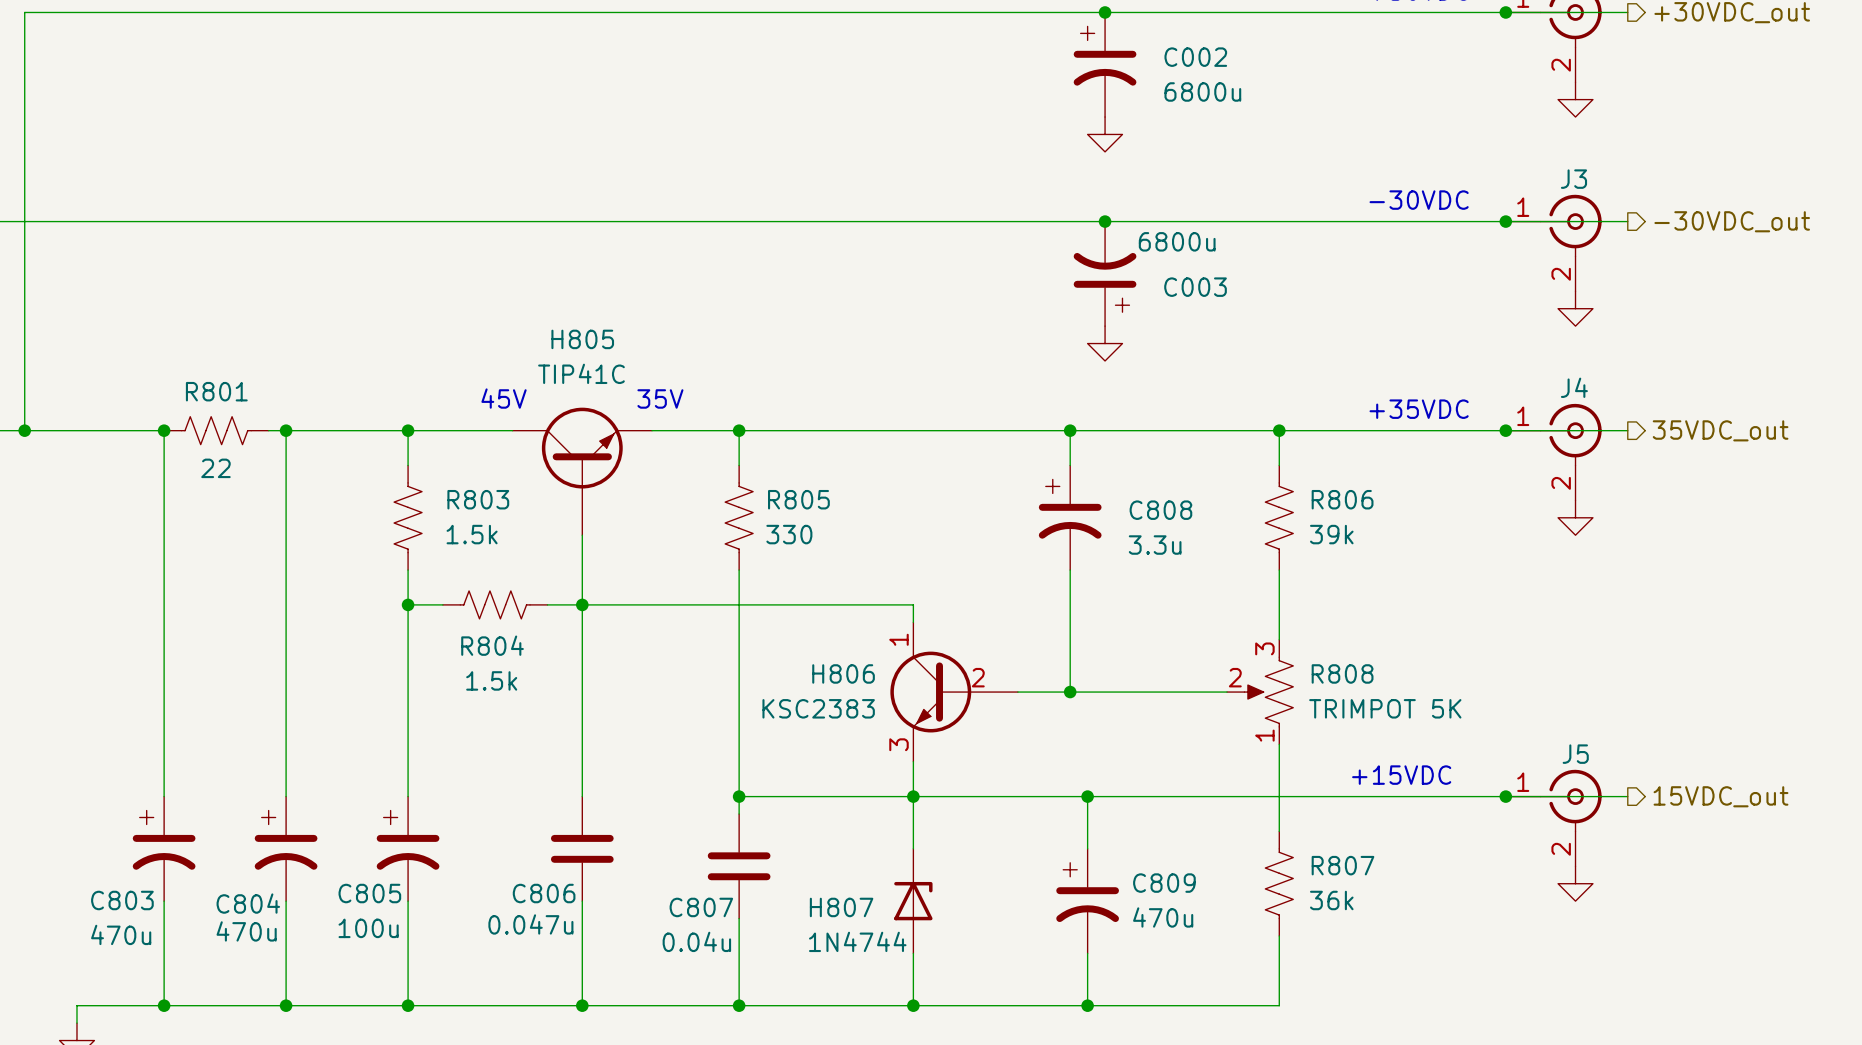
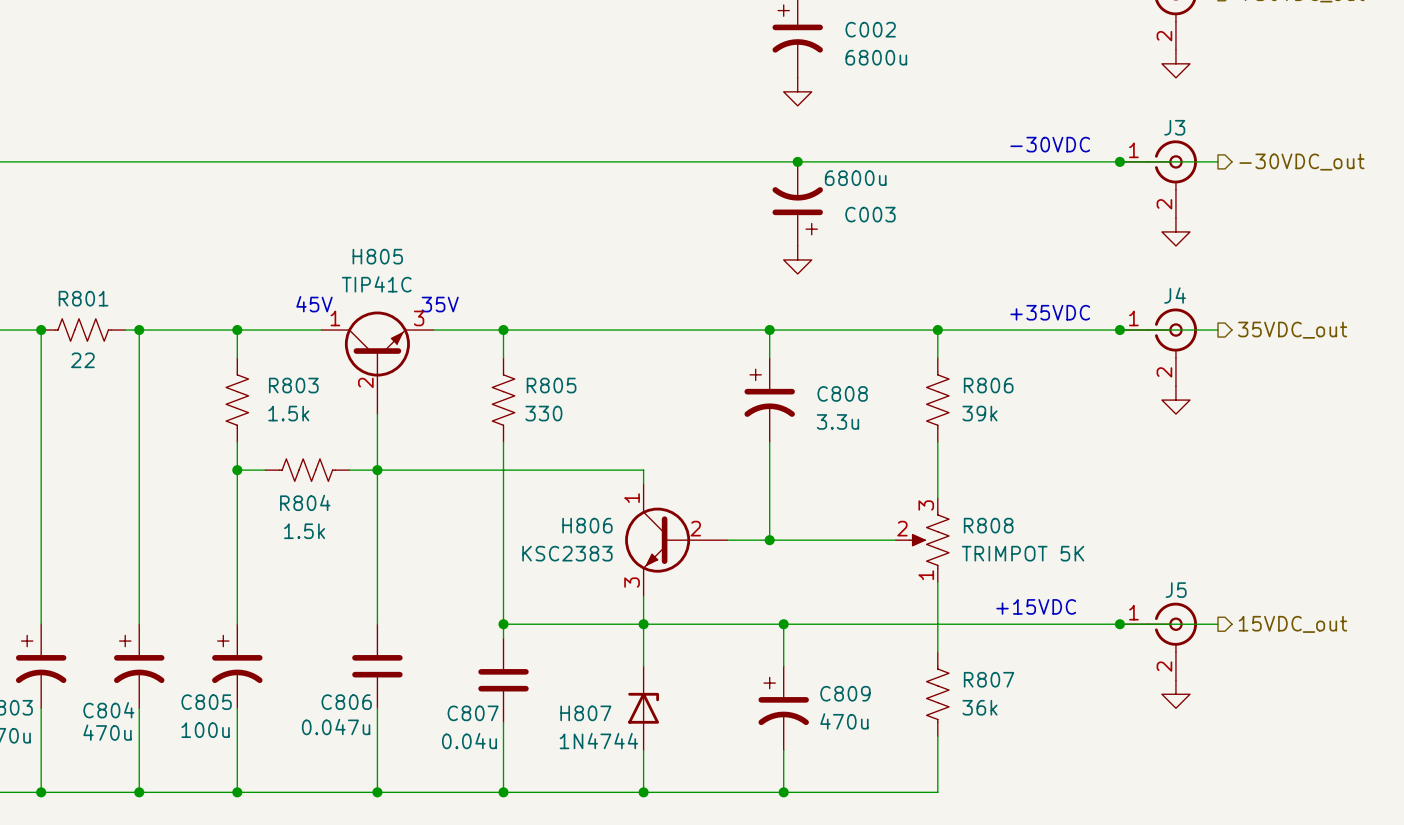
H805 pin number: none -> 1 (335, 318)
H805 pin number: none -> 3 (419, 318)
H805 pin number: none -> 2 (365, 382)

